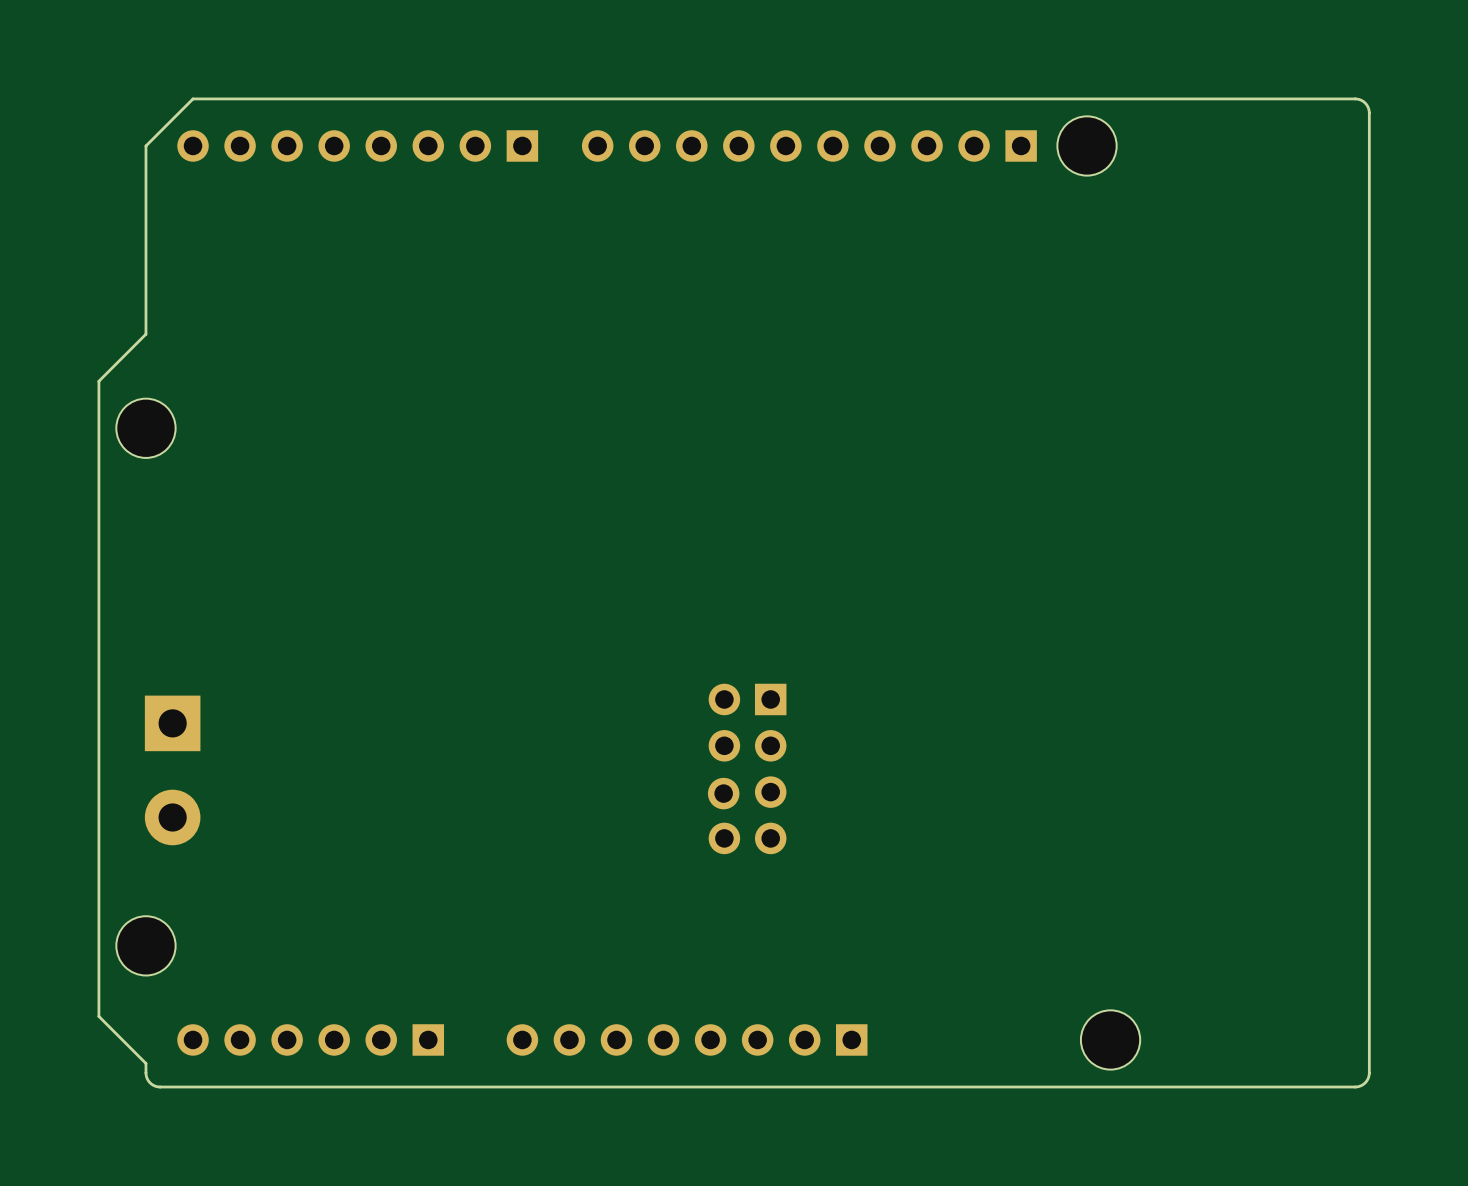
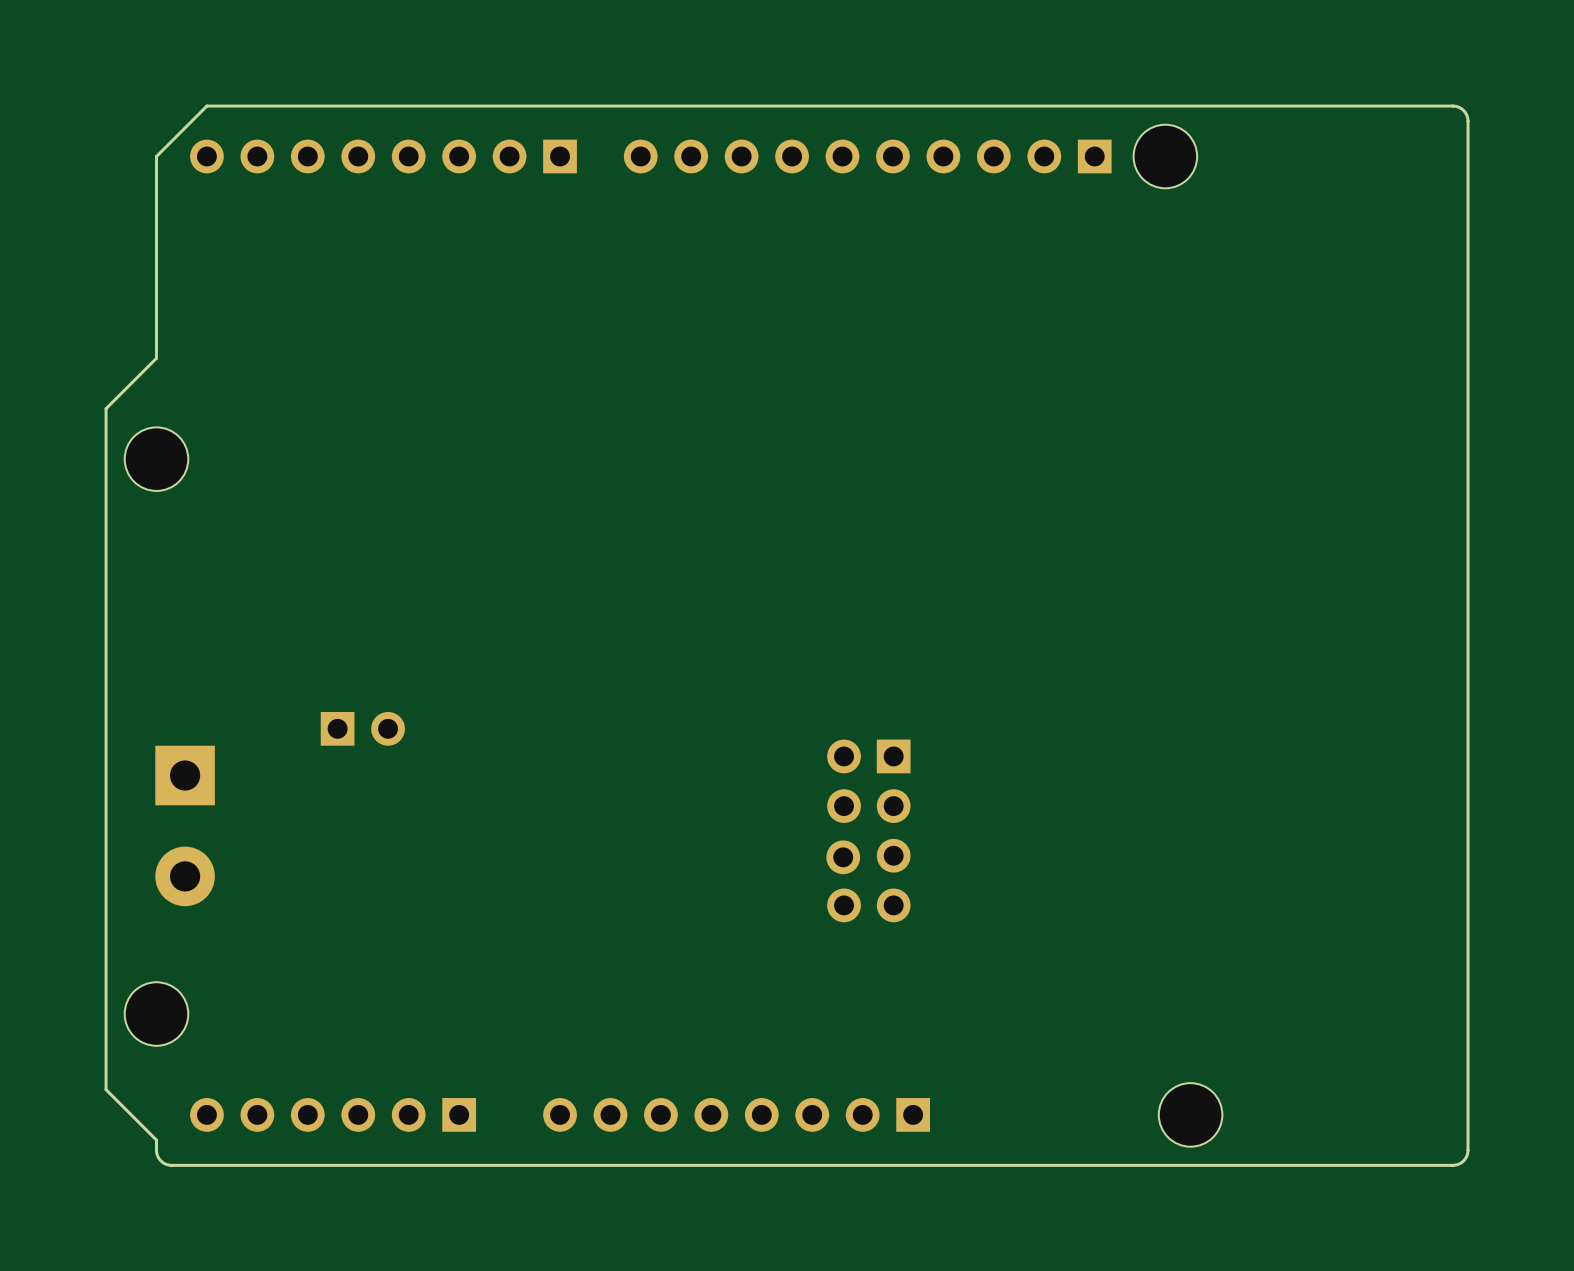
part: none -> (362, 728)
part position: (747, 768) -> (868, 830)

